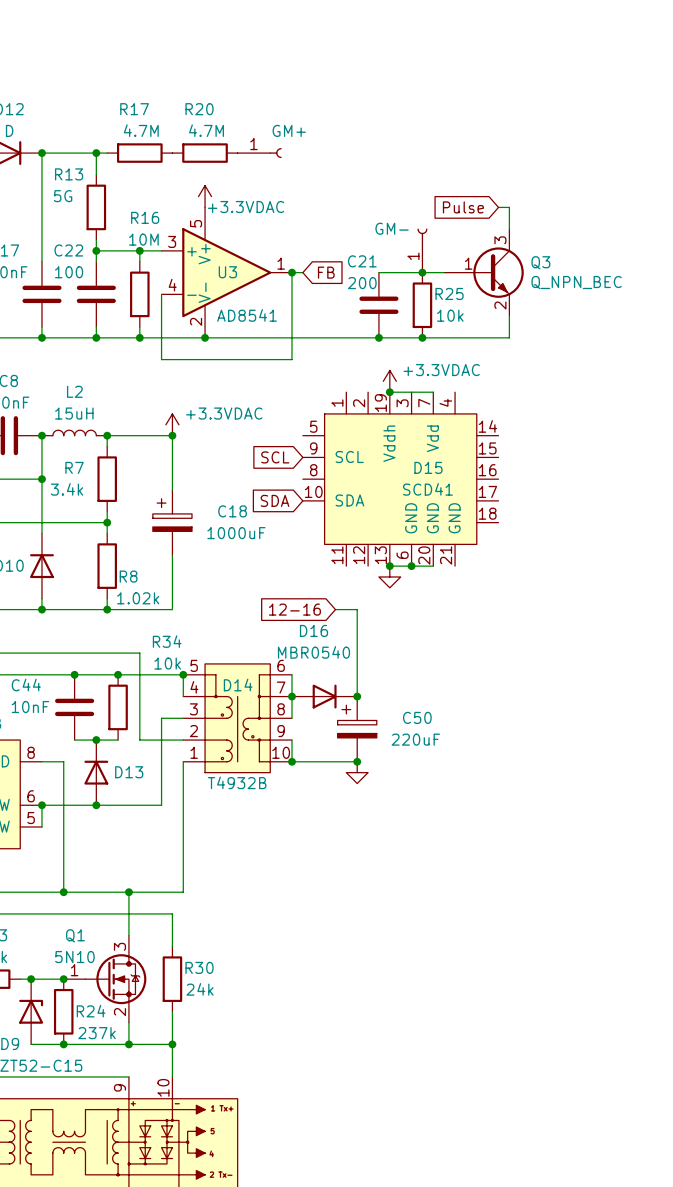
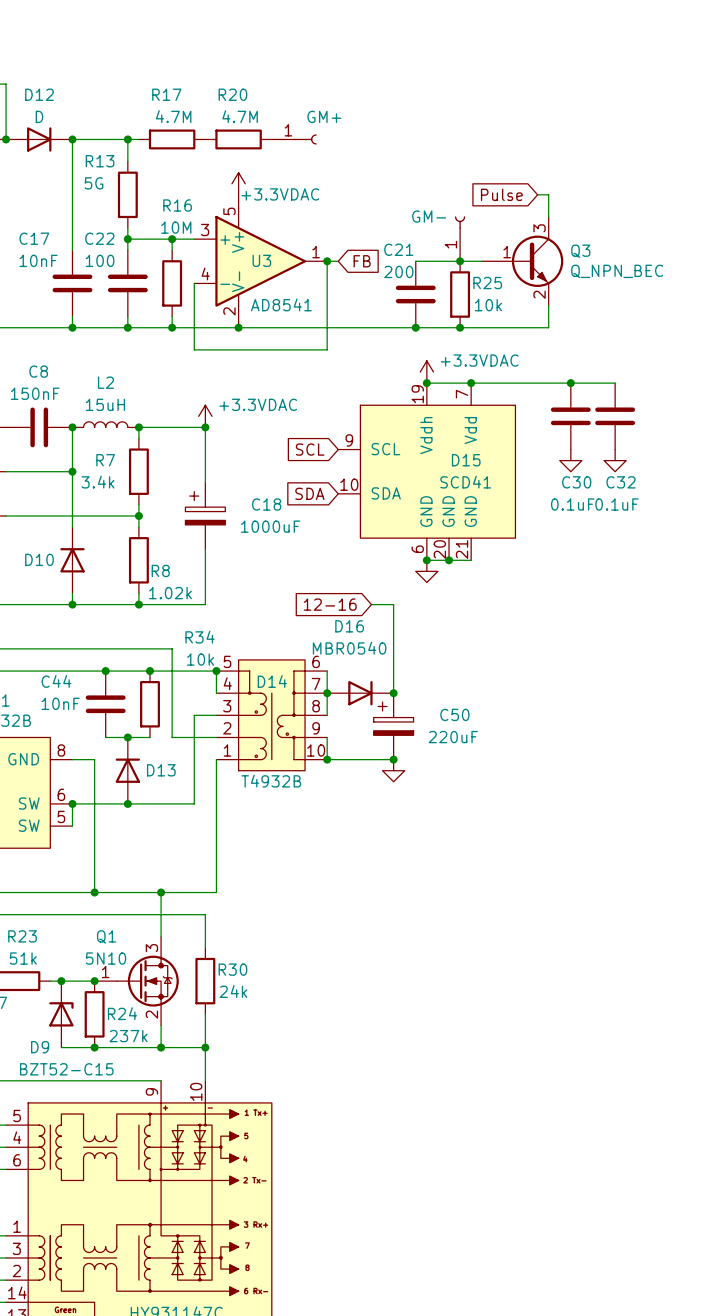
D15 symbol: [302, 392, 499, 567] -> [338, 383, 516, 561]
wire: none -> (471, 383) (615, 383)
junction: none -> (471, 383)
junction: none -> (570, 383)
C30: none -> 0.1uF (570, 416)
C32: none -> 0.1uF (615, 416)
power symbol: none -> (570, 460)
power symbol: none -> (615, 460)

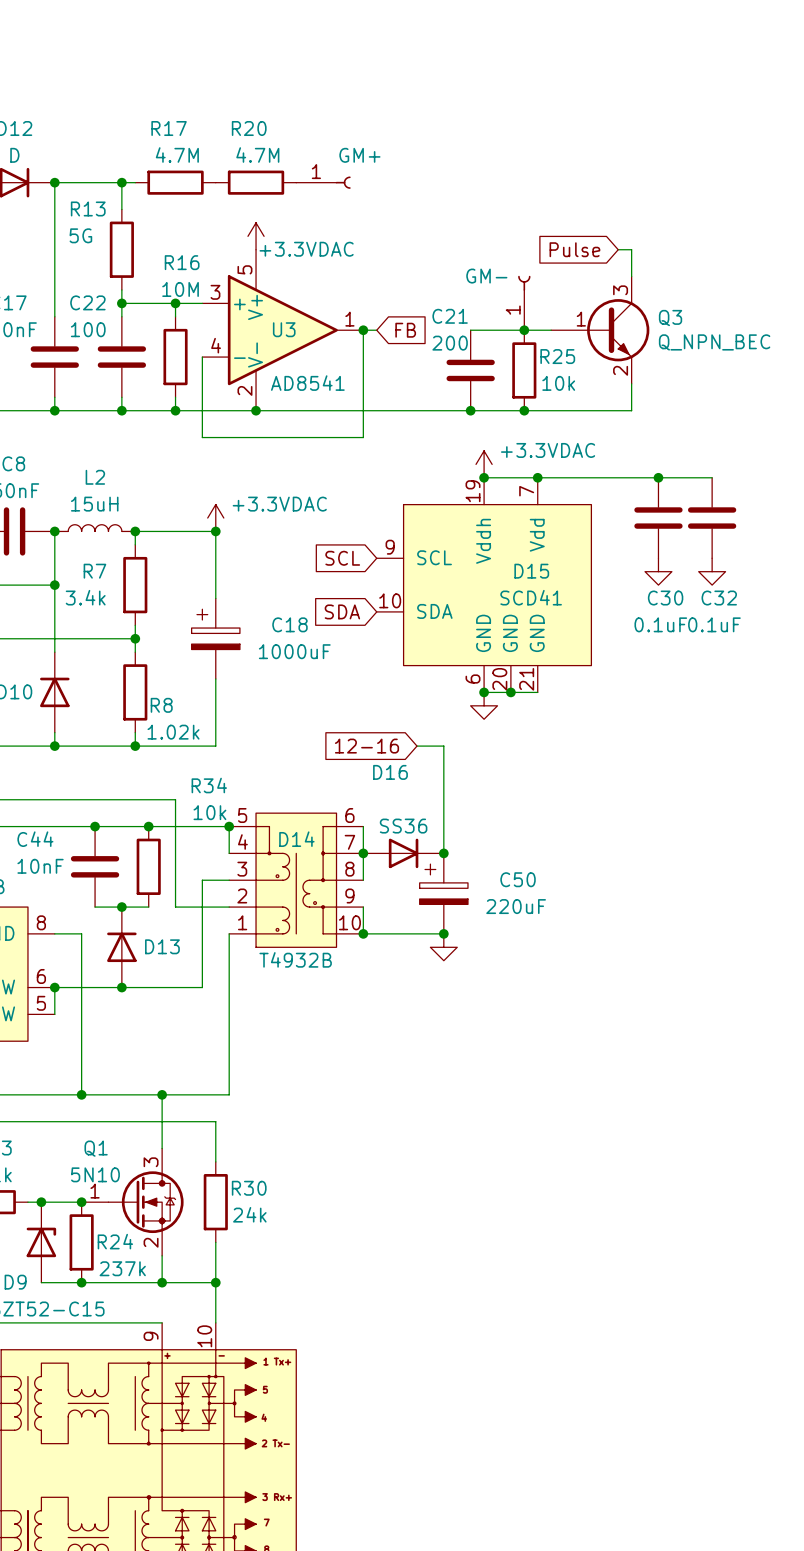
D16 value: MBR0540 (349, 648) -> SS36 (403, 826)

